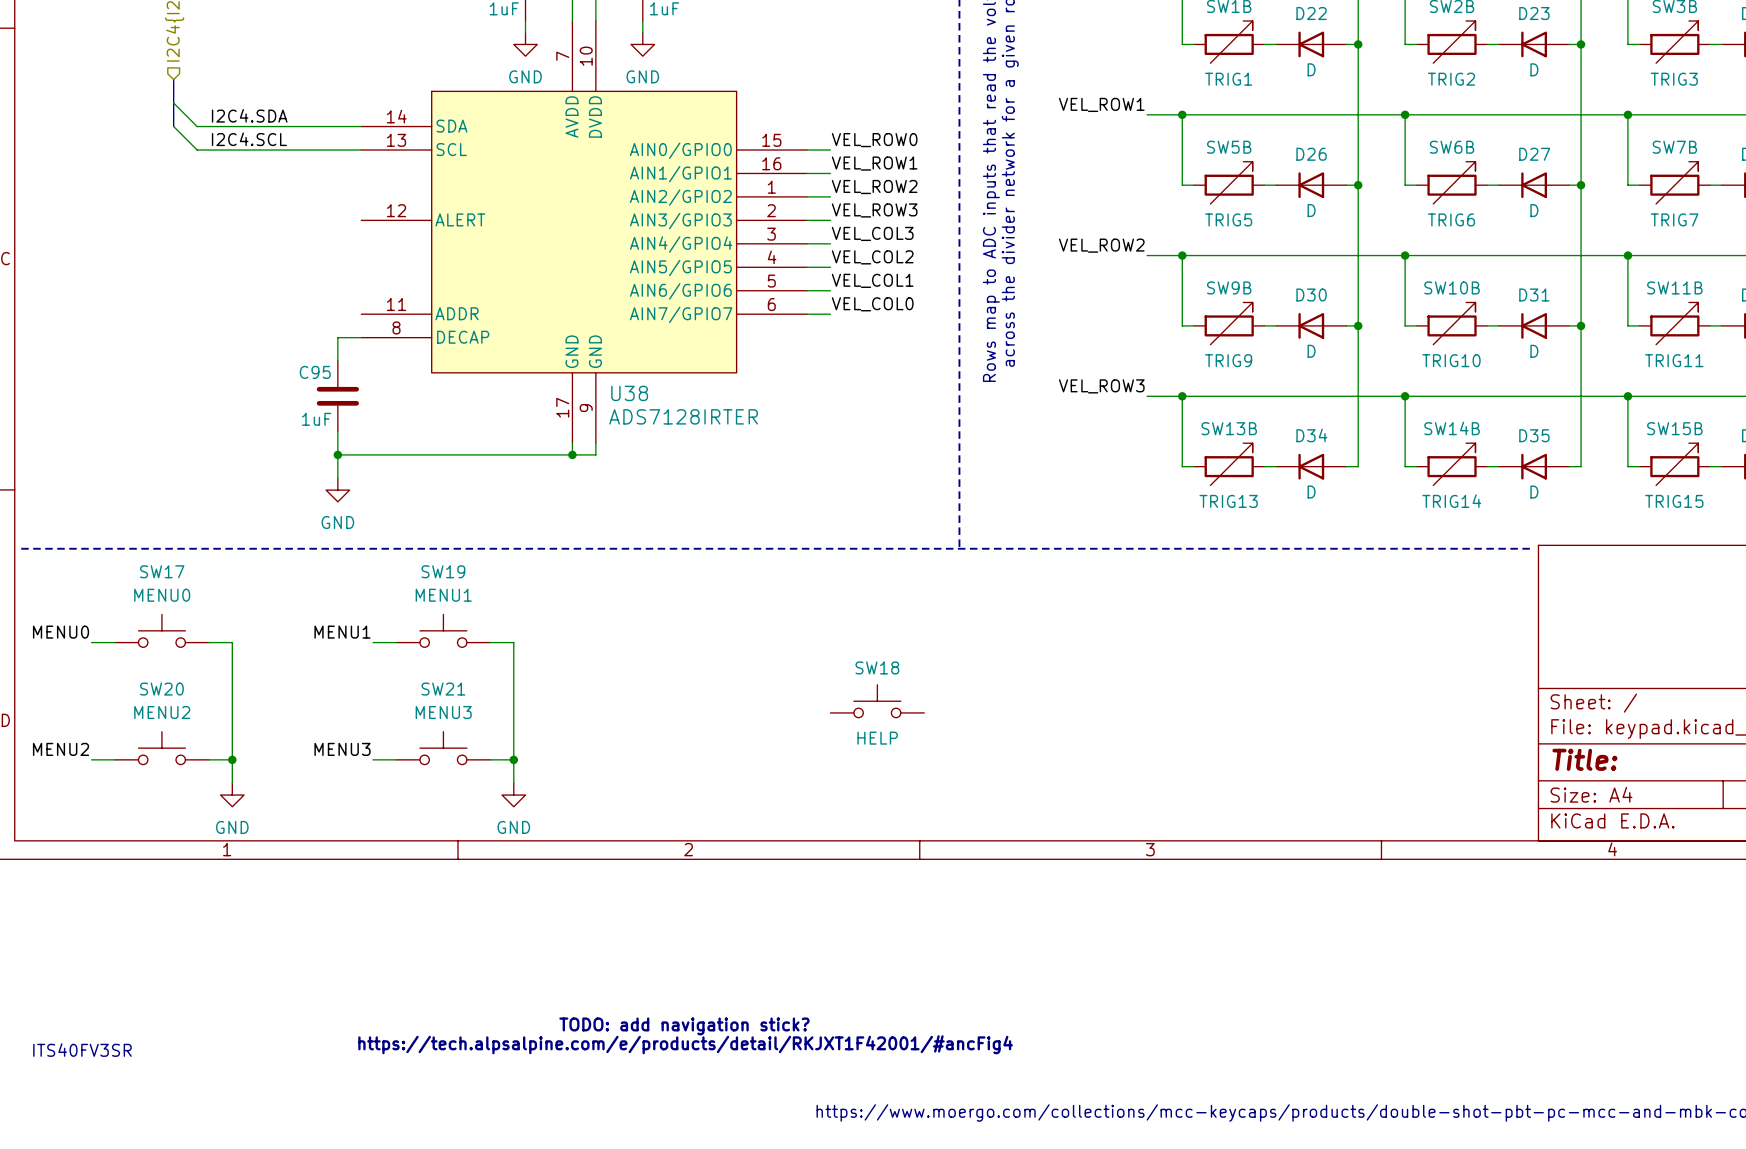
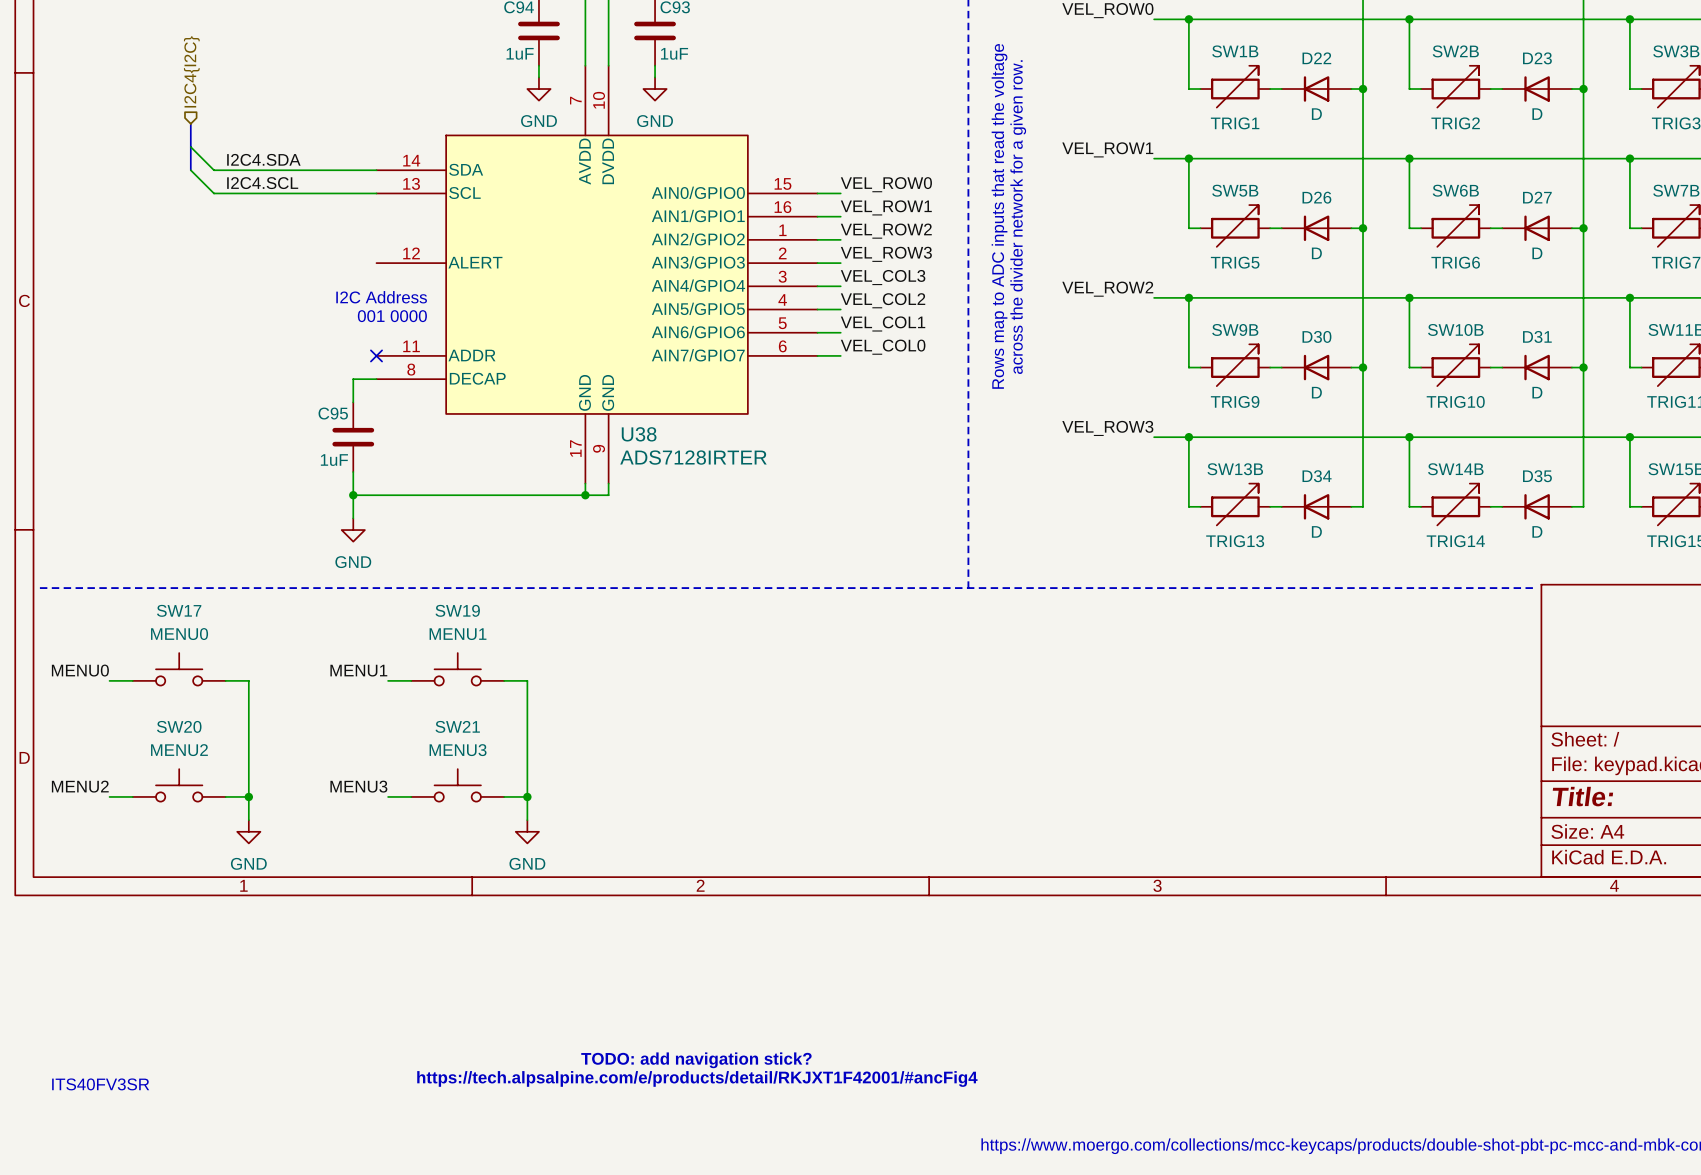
text: none -> I2C Address (381, 297)
text: none -> 001 0000 (392, 316)
no-connect mark: none -> (376, 355)
SW18: HELP (877, 701) -> none

